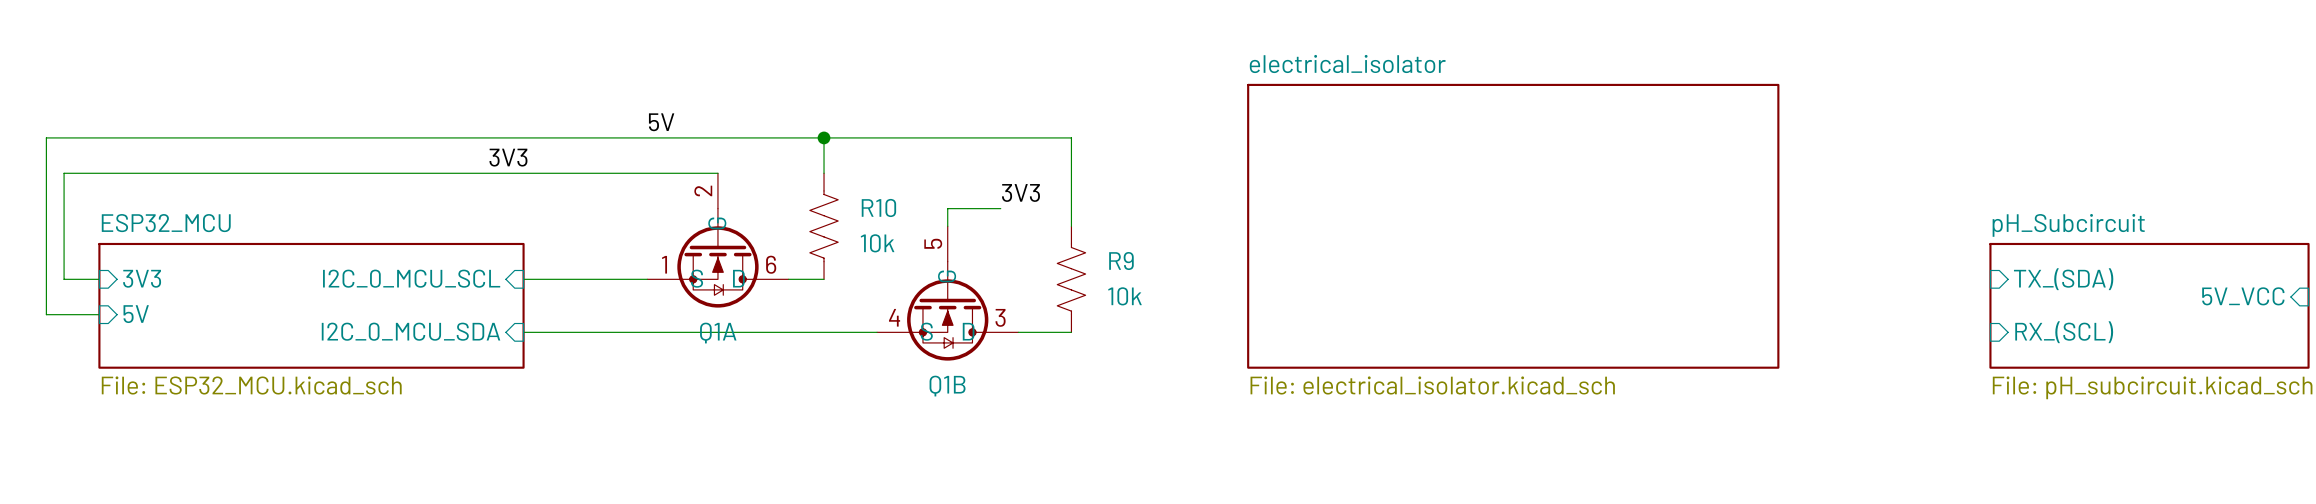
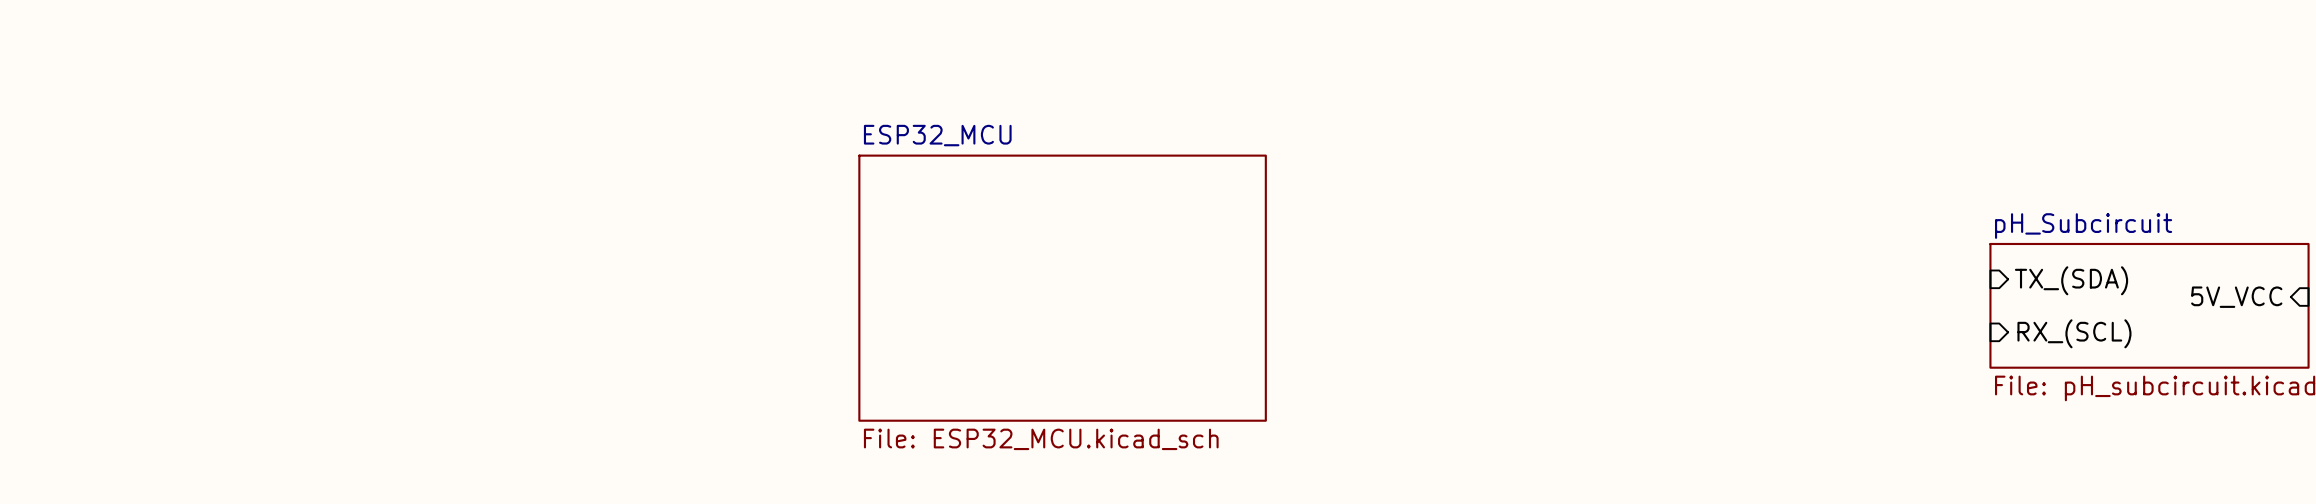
label: 5V (661, 122) -> none
wire: (824, 137) (824, 173) -> none
junction: (824, 137) -> none
label: 3V3 (508, 157) -> none
wire: (717, 173) (64, 173) (64, 279) (99, 279) -> none
label: 3V3 (1020, 192) -> none
wire: (1000, 208) (947, 208) (947, 226) -> none
sheet ESP32_MCU name position: ESP32_MCU (166, 223) -> ESP32_MCU (937, 135)
R10: 10k (824, 226) -> none
wire: (1071, 226) (1071, 137) (46, 137) (46, 314) (99, 314) -> none
sheet electrical_isolator: File: electrical_isolator.kicad_sch (1513, 226) -> none
Q1A: (717, 240) -> none
sheet ESP32_MCU shape: [98, 242, 525, 369] -> [858, 154, 1267, 422]
sheet pin: 3V3 (142, 278) -> none
sheet pin: I2C_0_MCU_SCL (411, 278) -> none
wire: (523, 279) (647, 279) -> none
wire: (788, 279) (824, 279) -> none
R9: 10k (1071, 279) -> none
Q1B: (947, 293) -> none
sheet pin: 5V (136, 314) -> none
sheet pin: I2C_0_MCU_SDA (411, 331) -> none
wire: (523, 332) (877, 332) -> none
wire: (1018, 332) (1071, 332) -> none
sheet ESP32_MCU value position: File: ESP32_MCU.kicad_sch (251, 385) -> File: ESP32_MCU.kicad_sch (1041, 439)

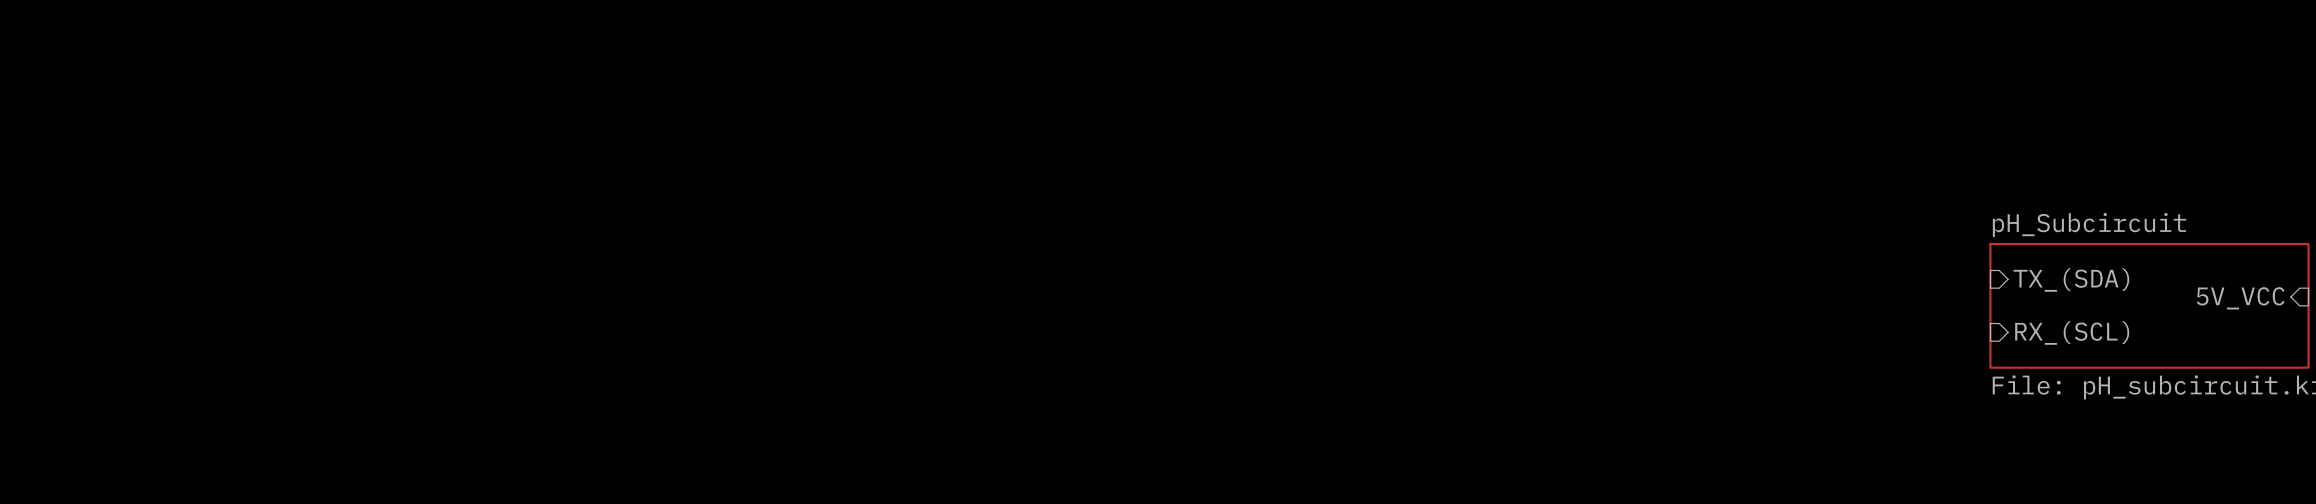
sheet ESP32_MCU: File: ESP32_MCU.kicad_sch (1062, 288) -> none

